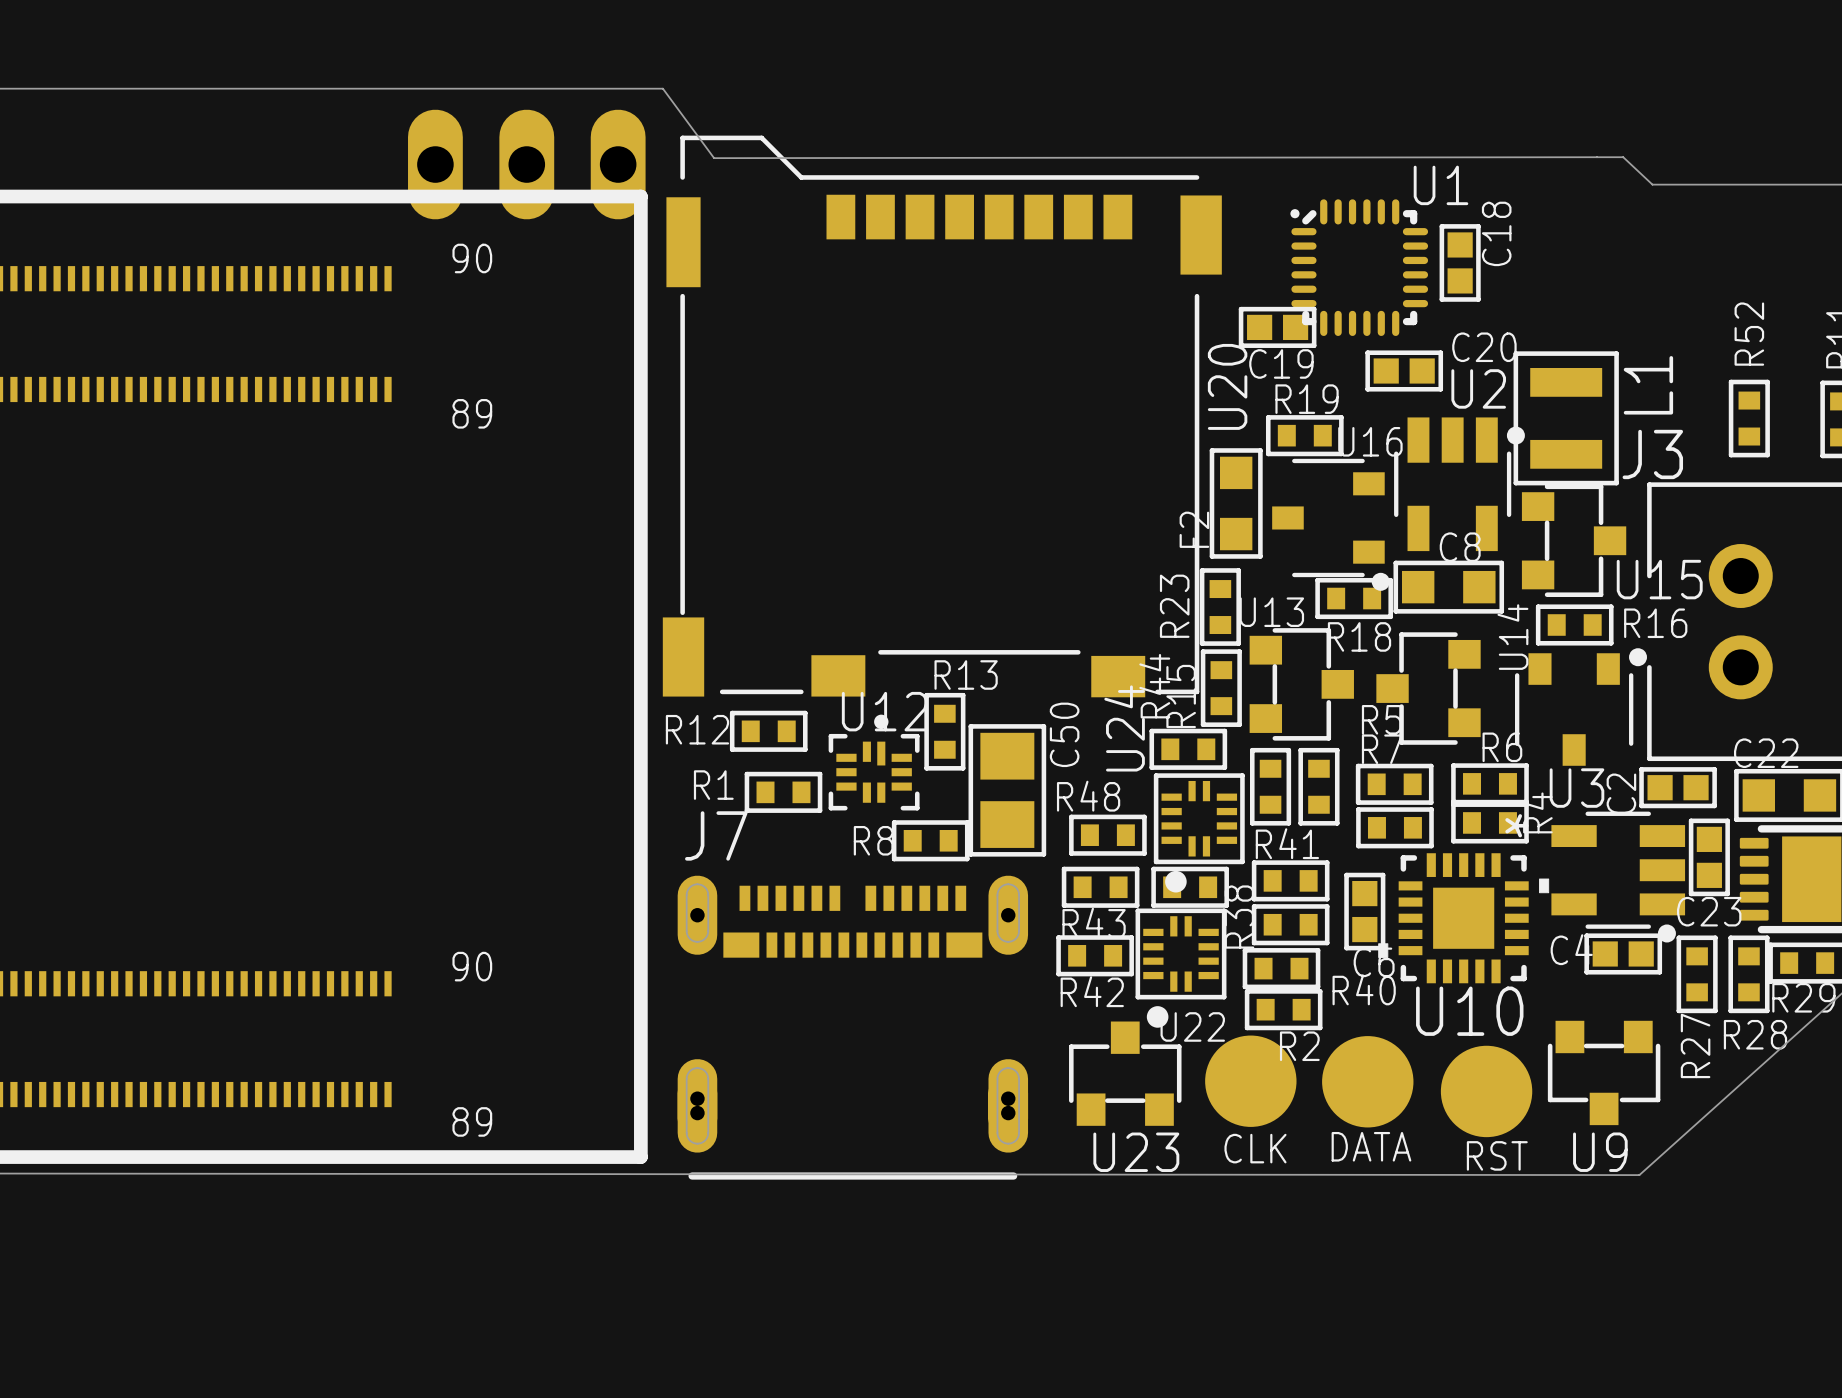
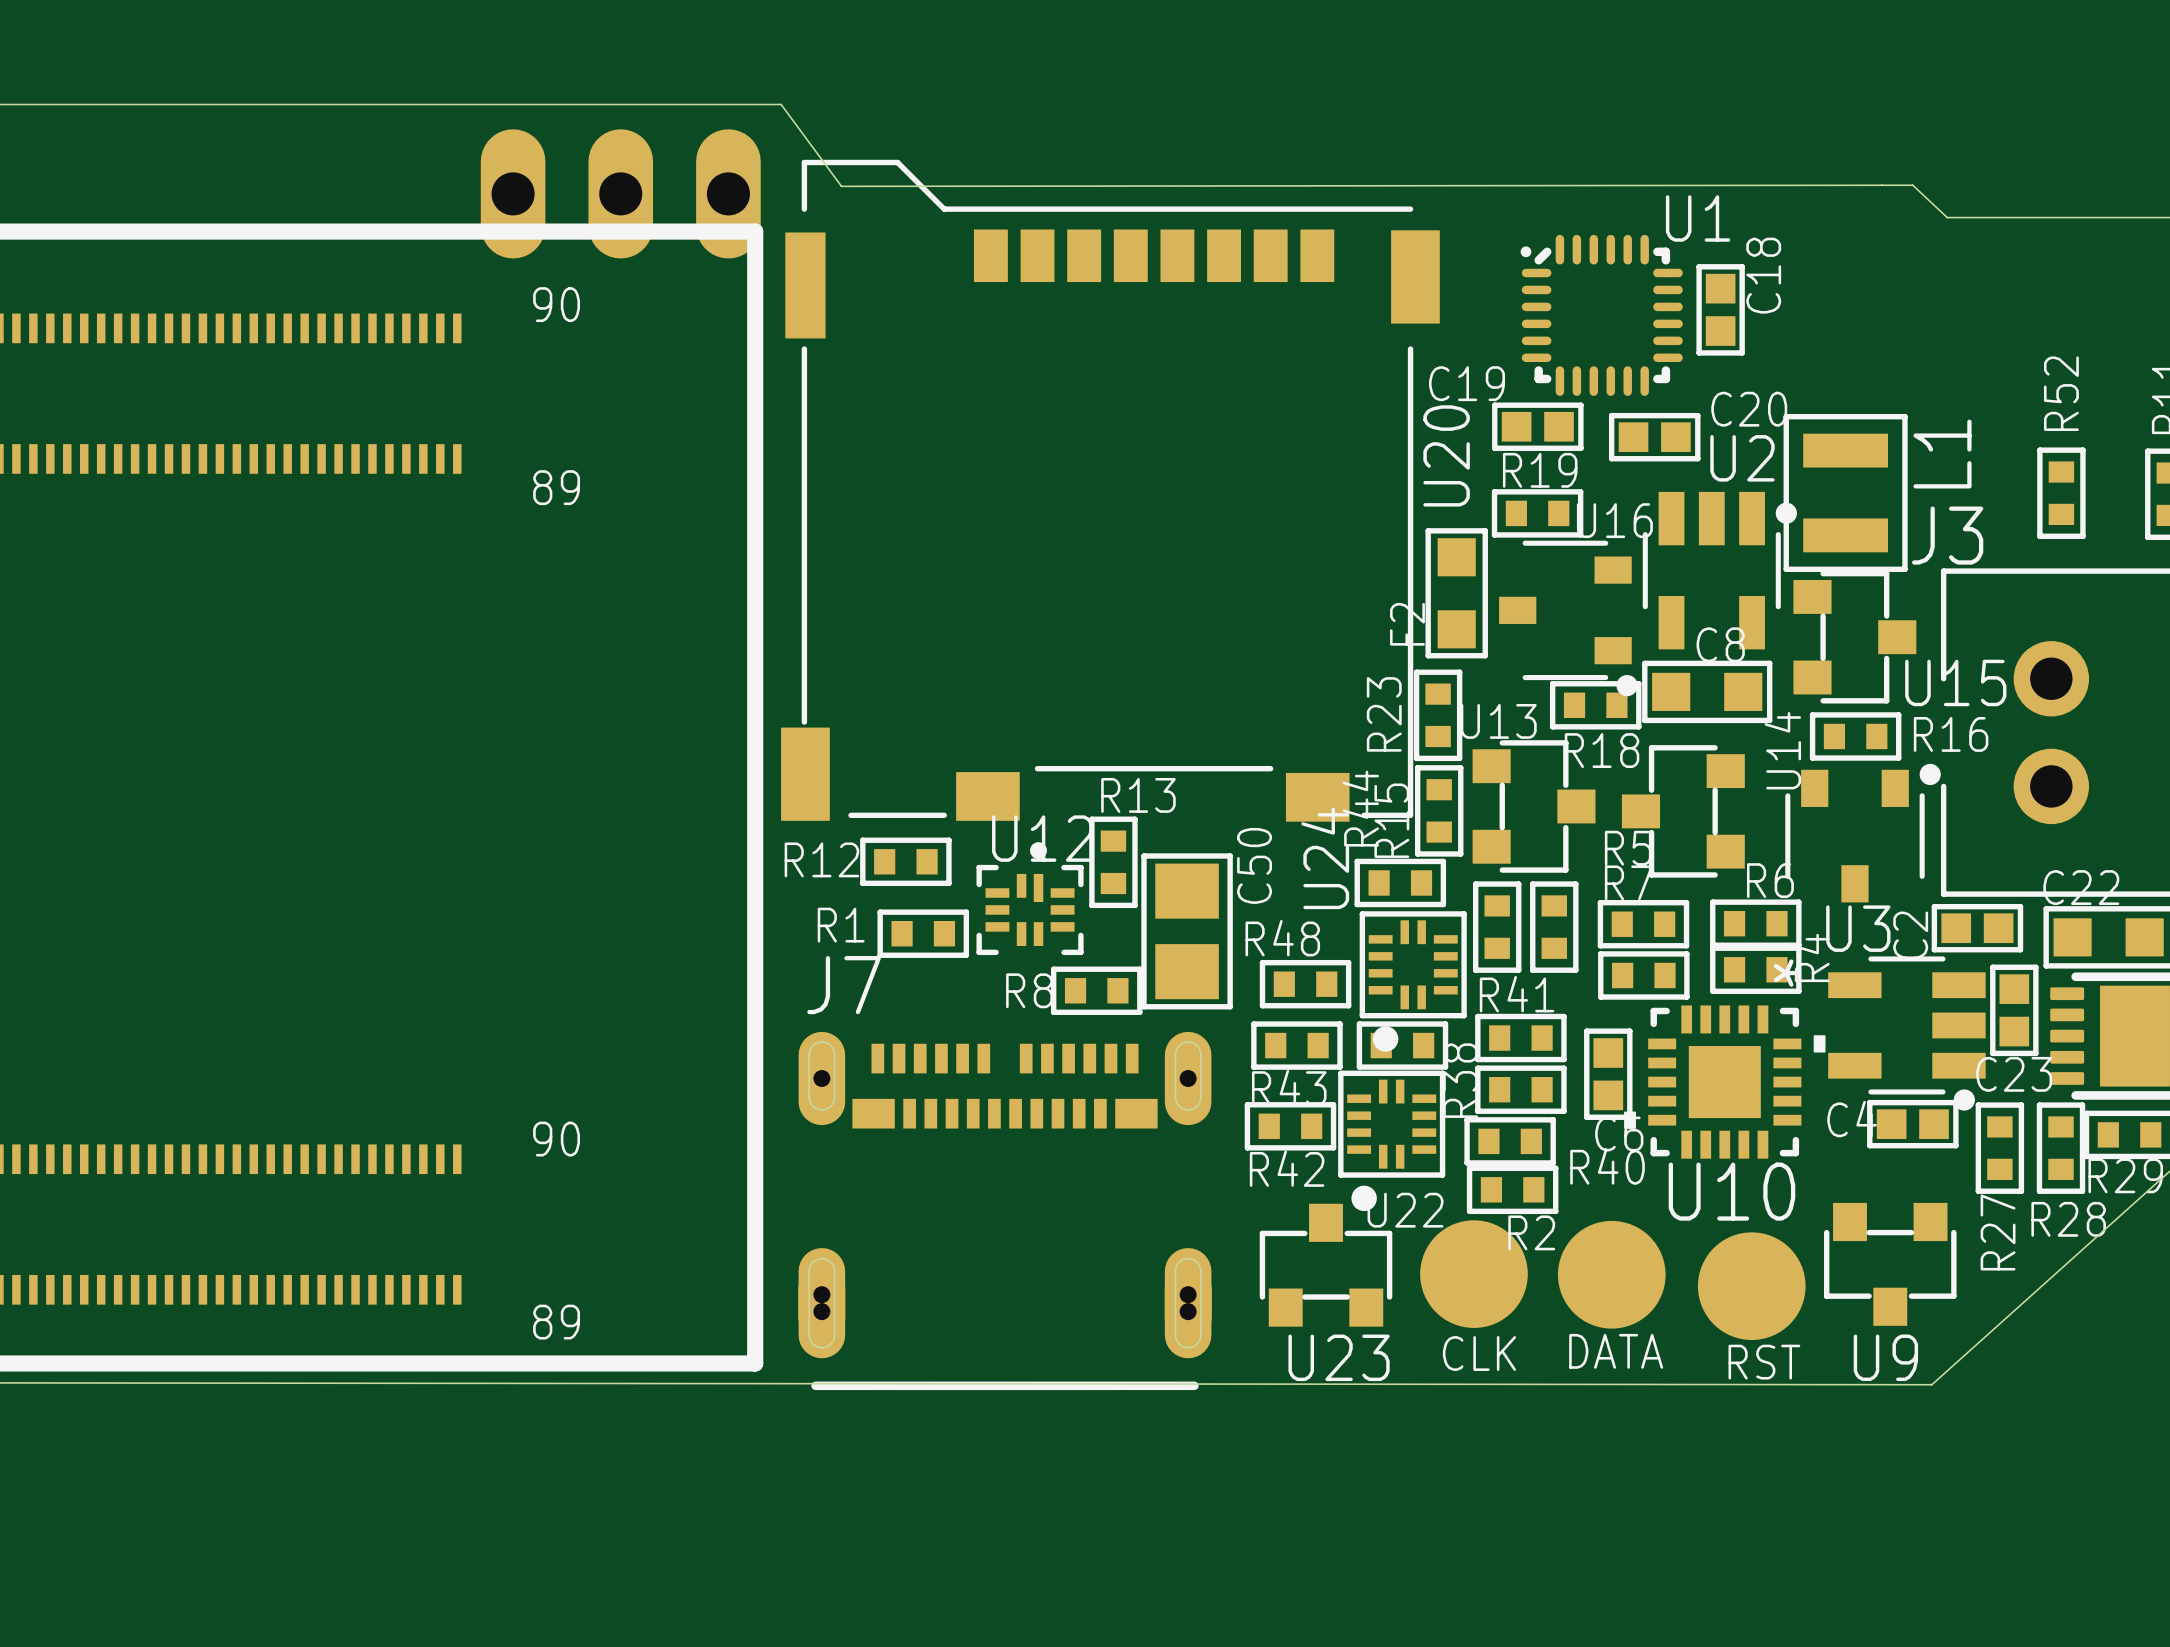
C19 position: (1277, 327) -> (1537, 426)
C19 name position: C19 (1281, 363) -> C19 (1466, 383)

